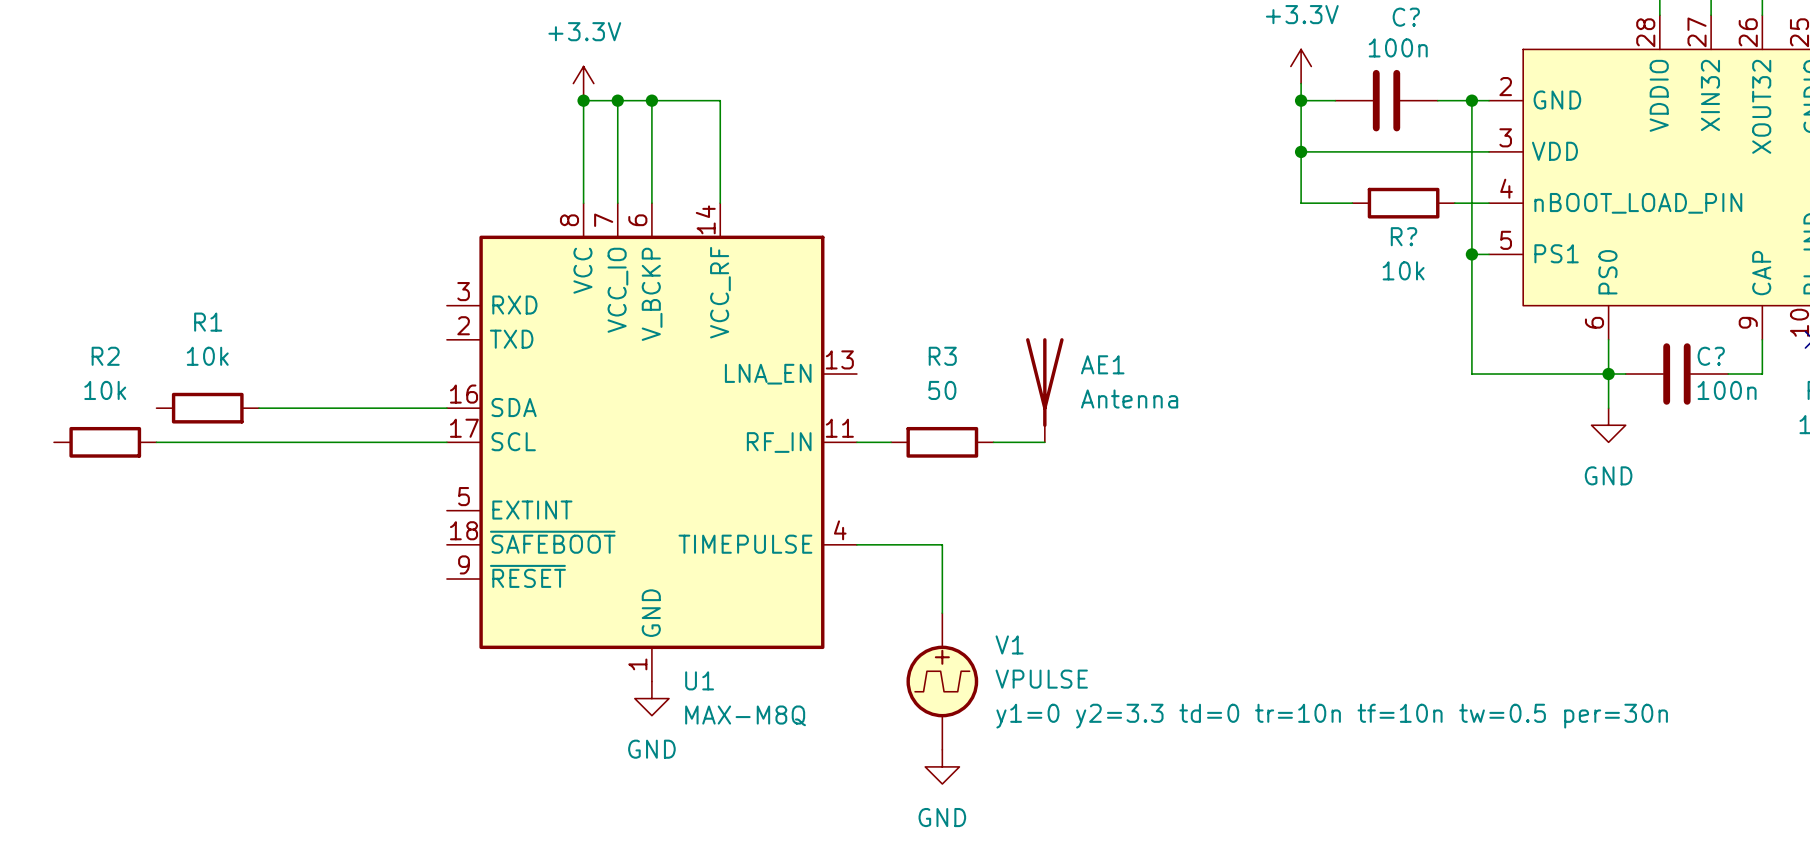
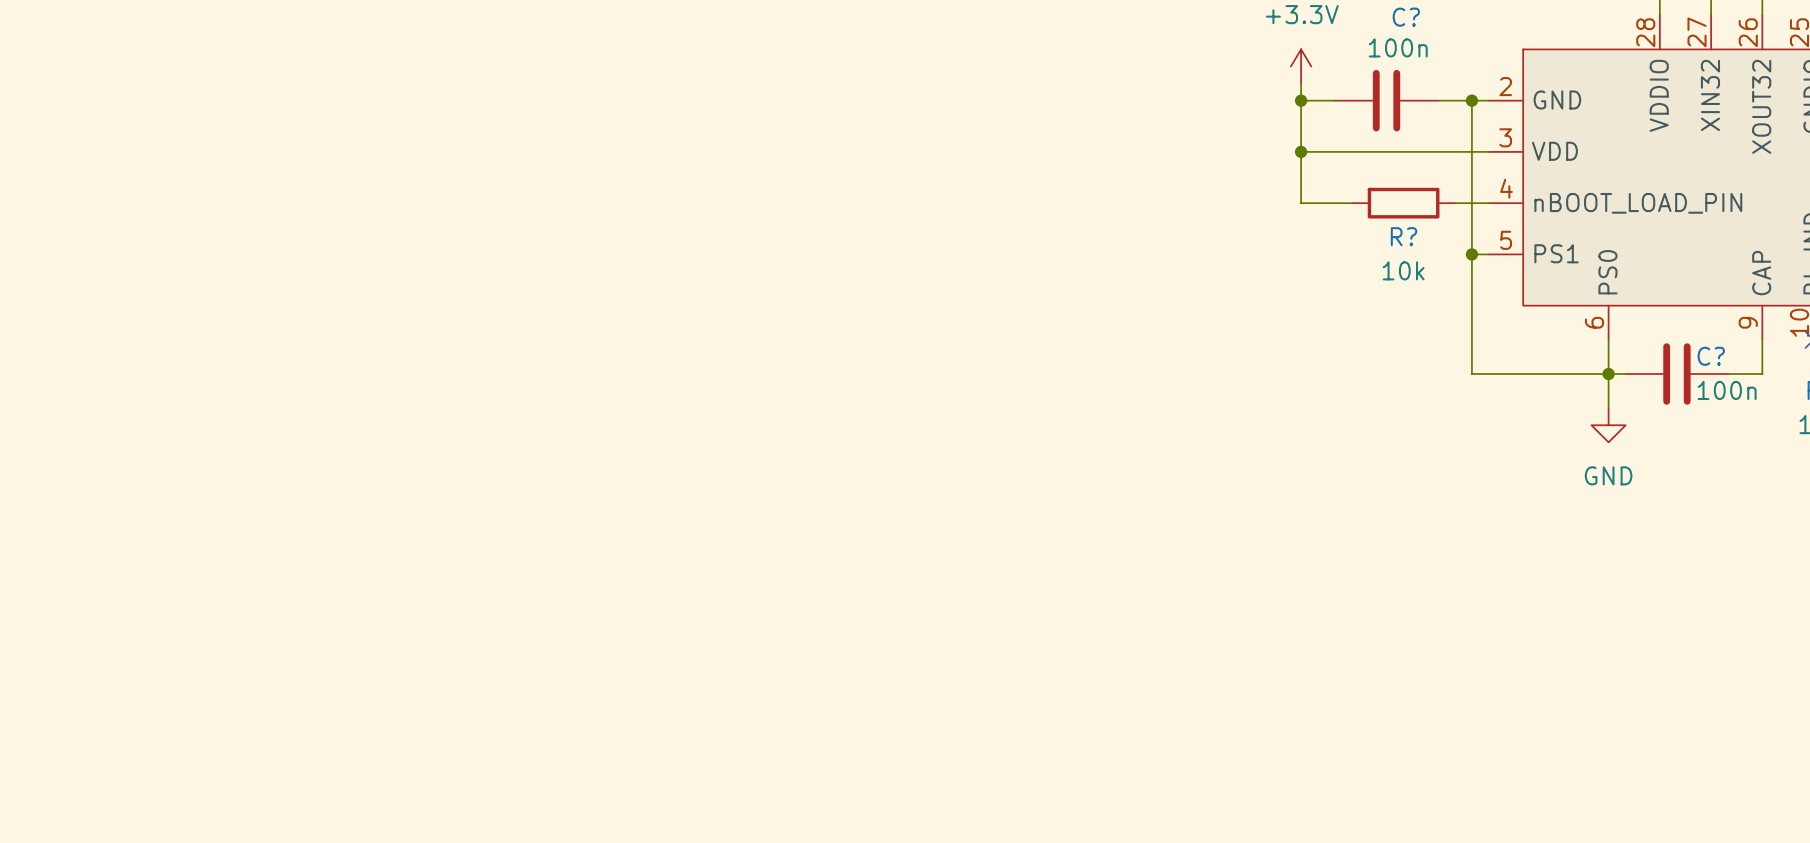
power symbol: +3.3V (583, 83) -> none
junction: (583, 100) -> none
wire: (617, 100) (617, 203) -> none
junction: (617, 100) -> none
wire: (651, 100) (651, 203) -> none
junction: (651, 100) -> none
wire: (583, 203) (583, 100) (720, 100) (720, 203) -> none
AE1: Antenna (1044, 390) -> none
R1: 10k (207, 408) -> none
wire: (259, 408) (446, 408) -> none
R2: 10k (105, 442) -> none
wire: (156, 442) (446, 442) -> none
U1: MAX-M8Q (651, 442) -> none
wire: (856, 442) (891, 442) -> none
R3: 50 (942, 442) -> none
wire: (993, 442) (1044, 442) -> none
wire: (856, 544) (942, 544) (942, 613) -> none
V1: VPULSE (942, 681) -> none
power symbol: GND (651, 698) -> none
power symbol: GND (942, 766) -> none

